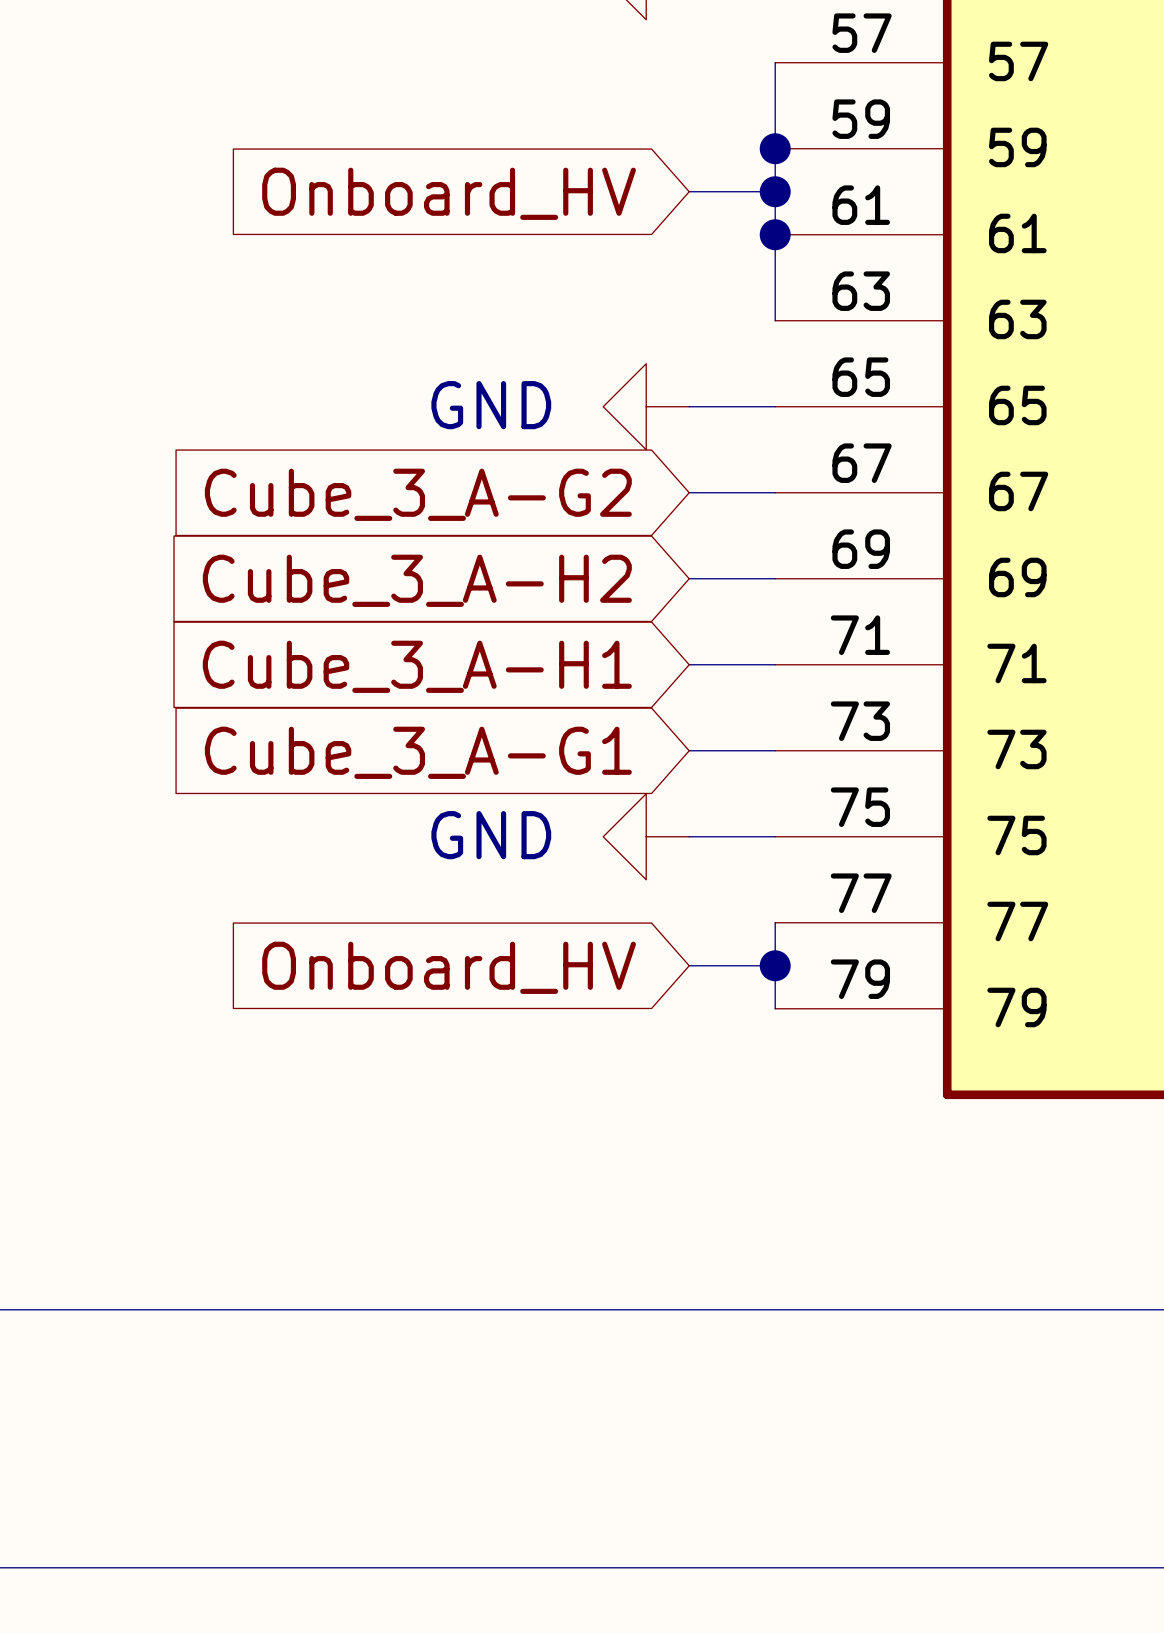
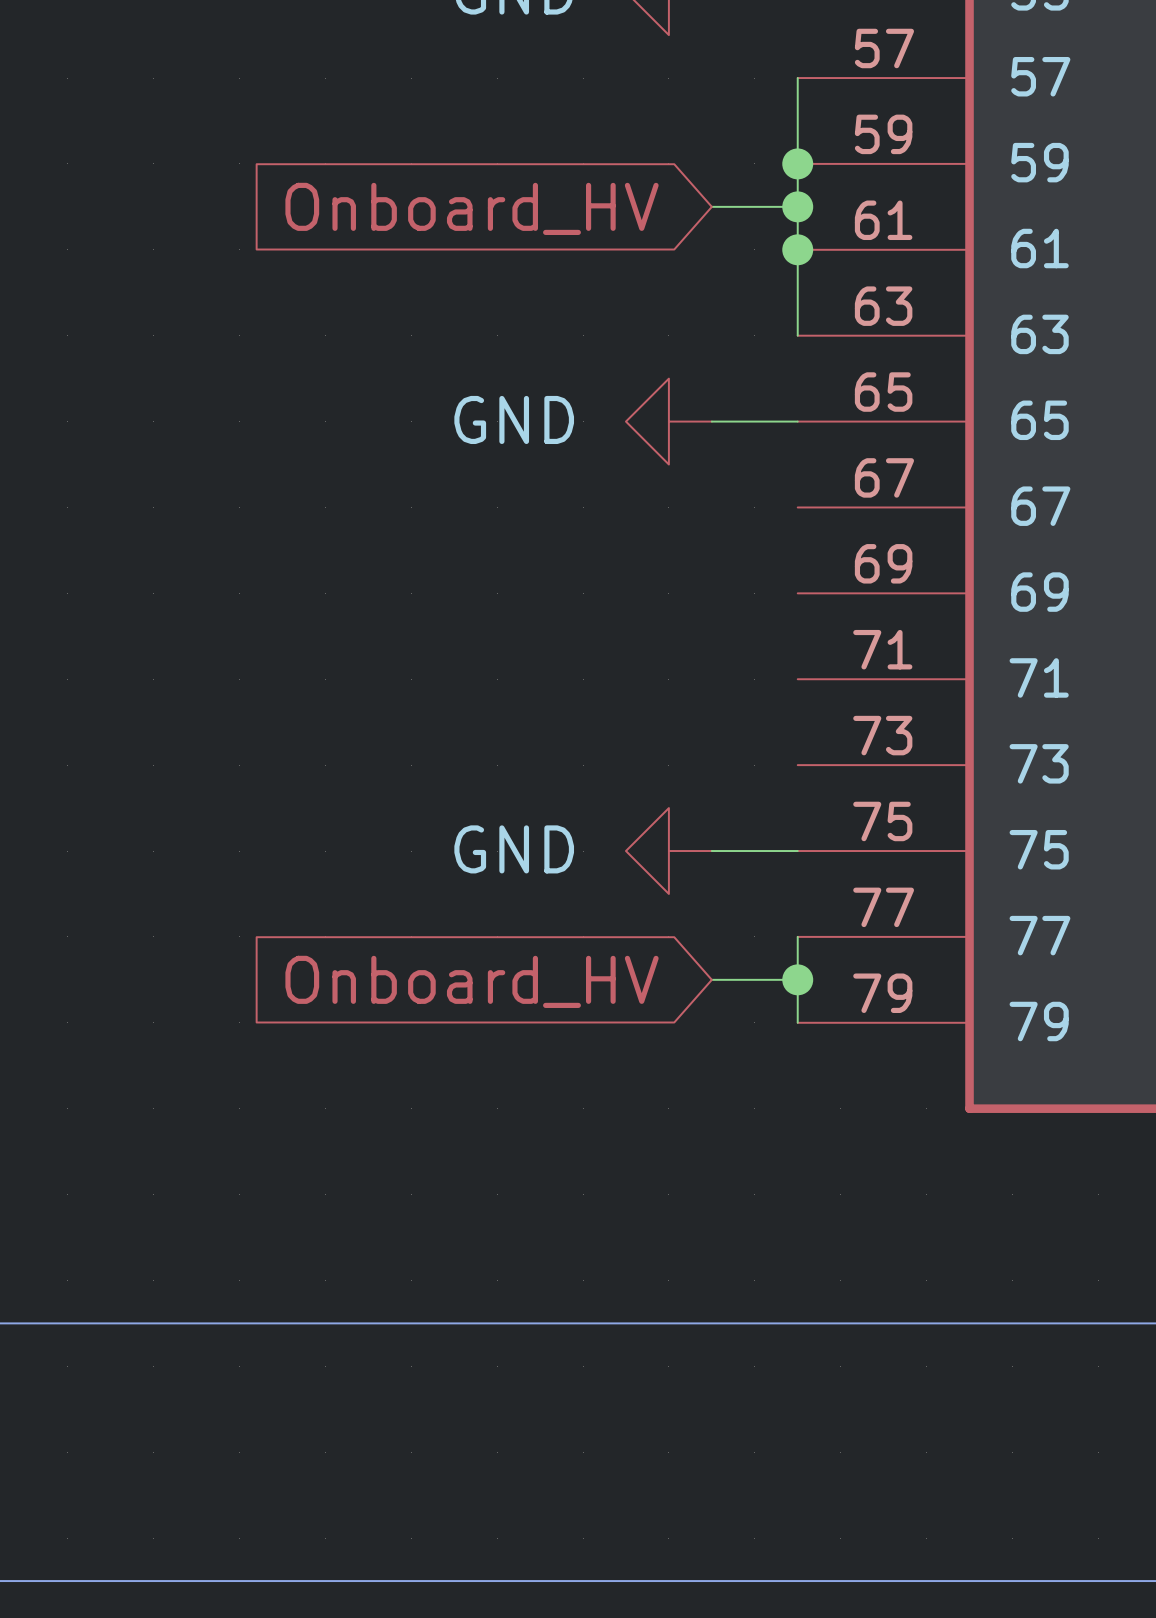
wire: (689, 492) (775, 492) -> none
global label: Cube_3_A-G2 (418, 494) -> none
wire: (689, 578) (775, 578) -> none
global label: Cube_3_A-H2 (417, 580) -> none
wire: (689, 664) (775, 664) -> none
global label: Cube_3_A-H1 (417, 666) -> none
wire: (689, 750) (775, 750) -> none
global label: Cube_3_A-G1 (418, 752) -> none

